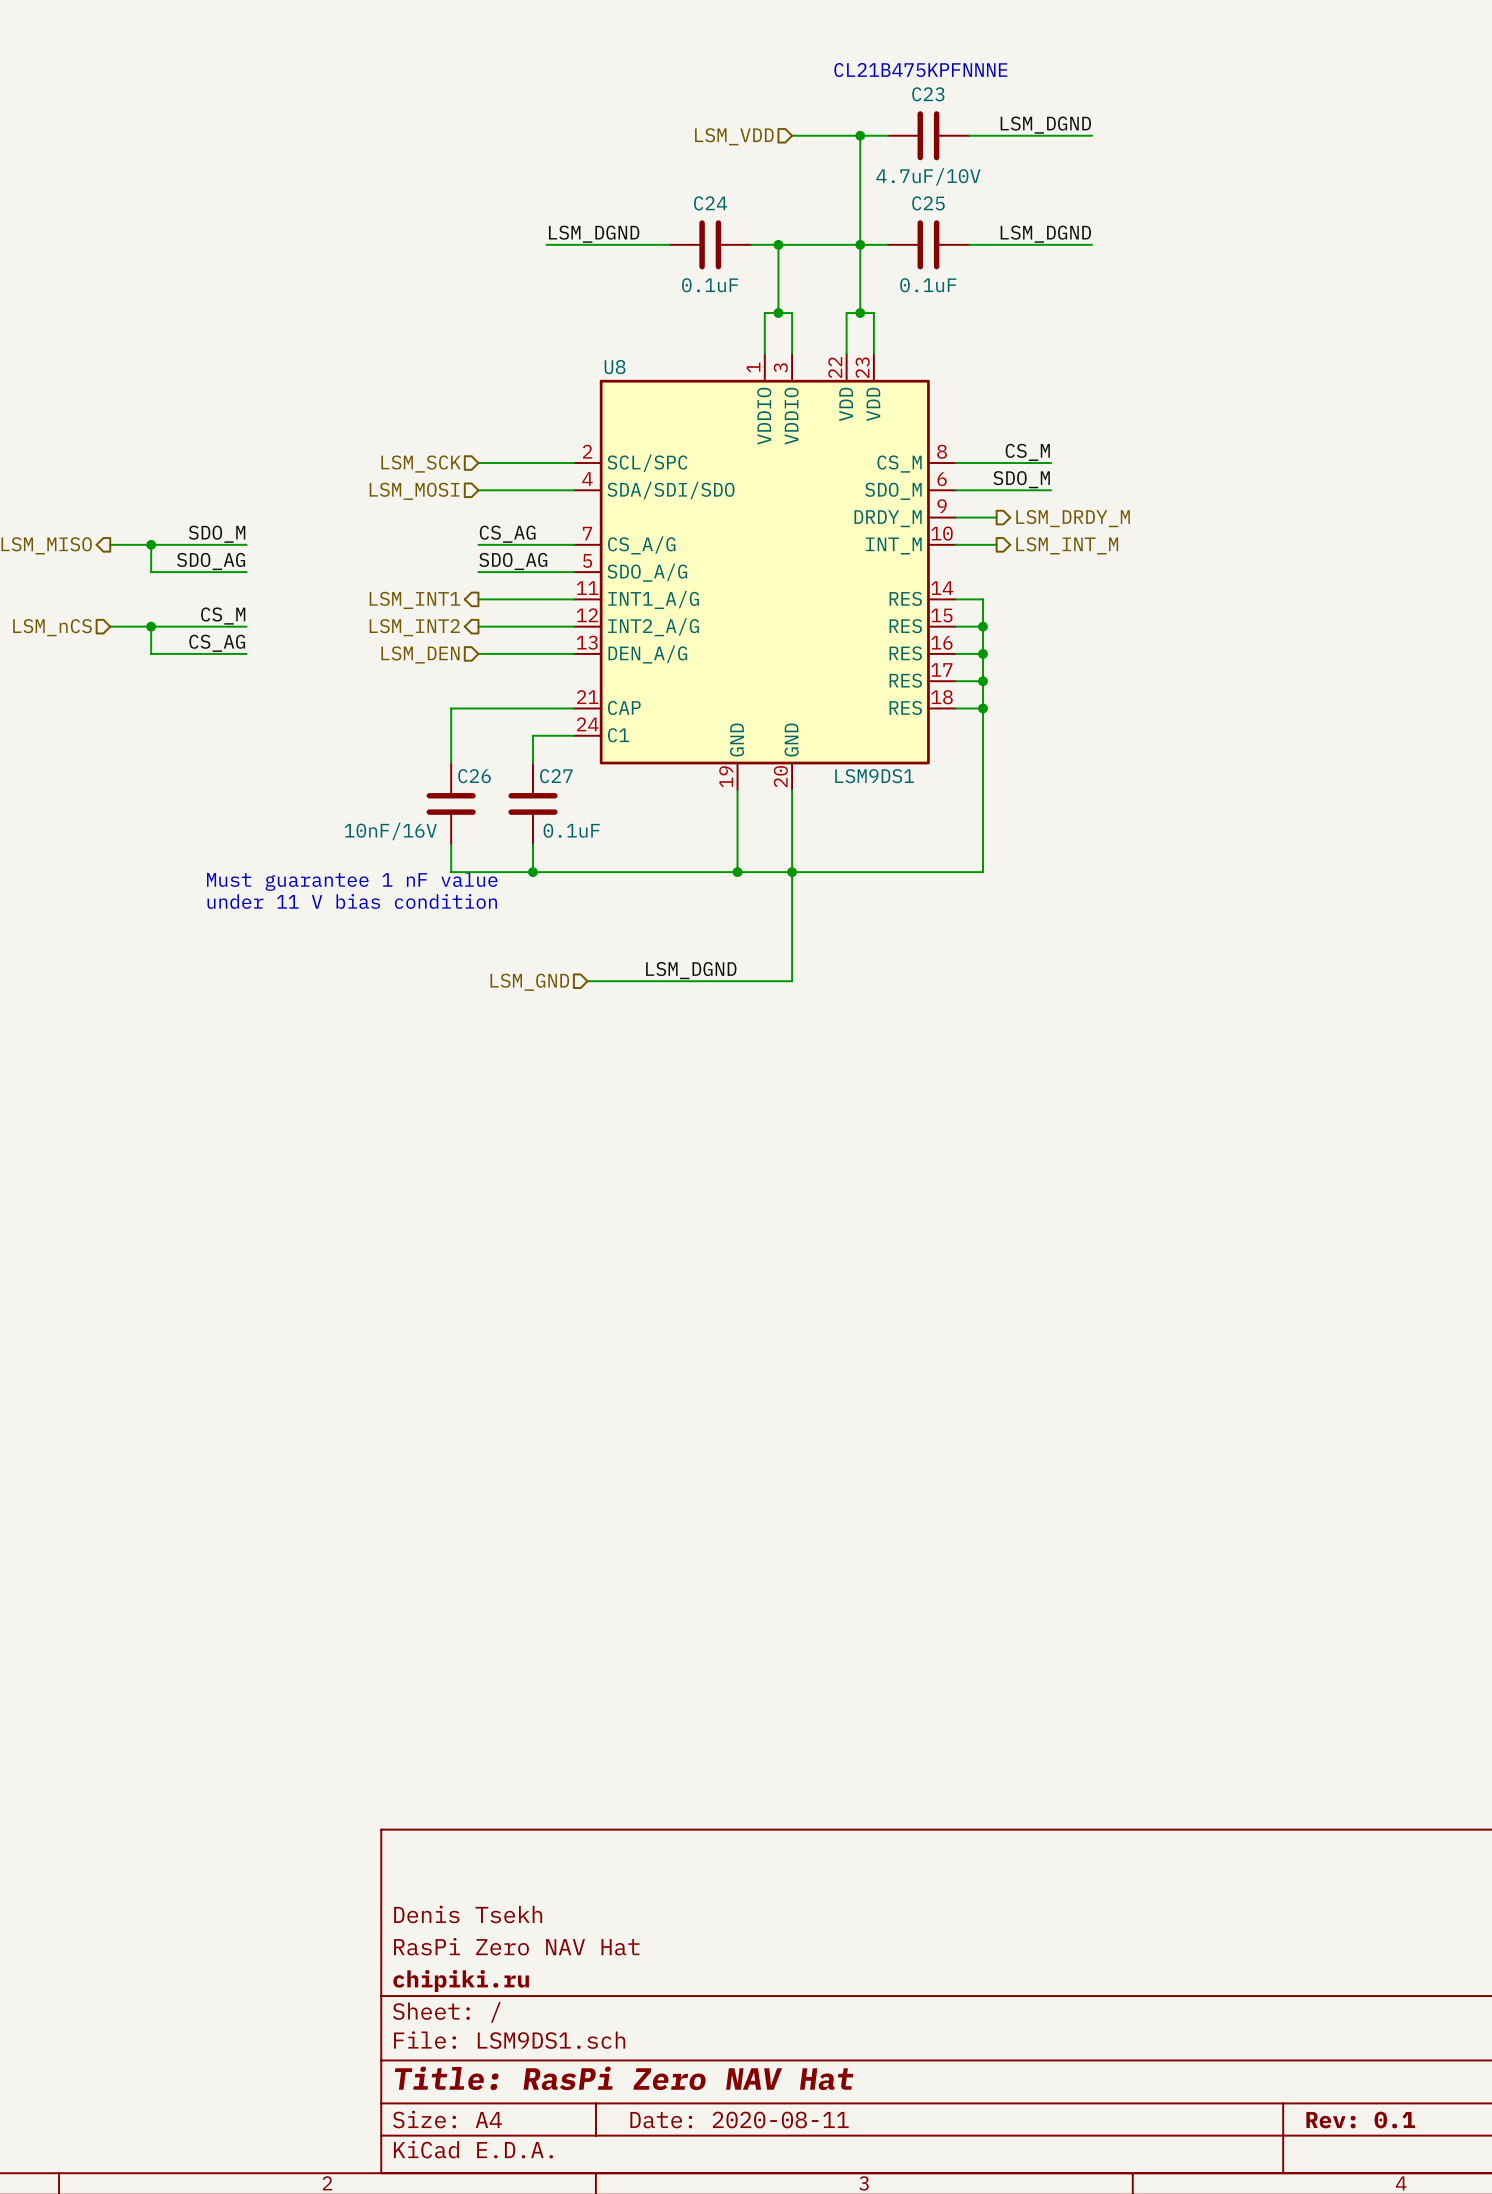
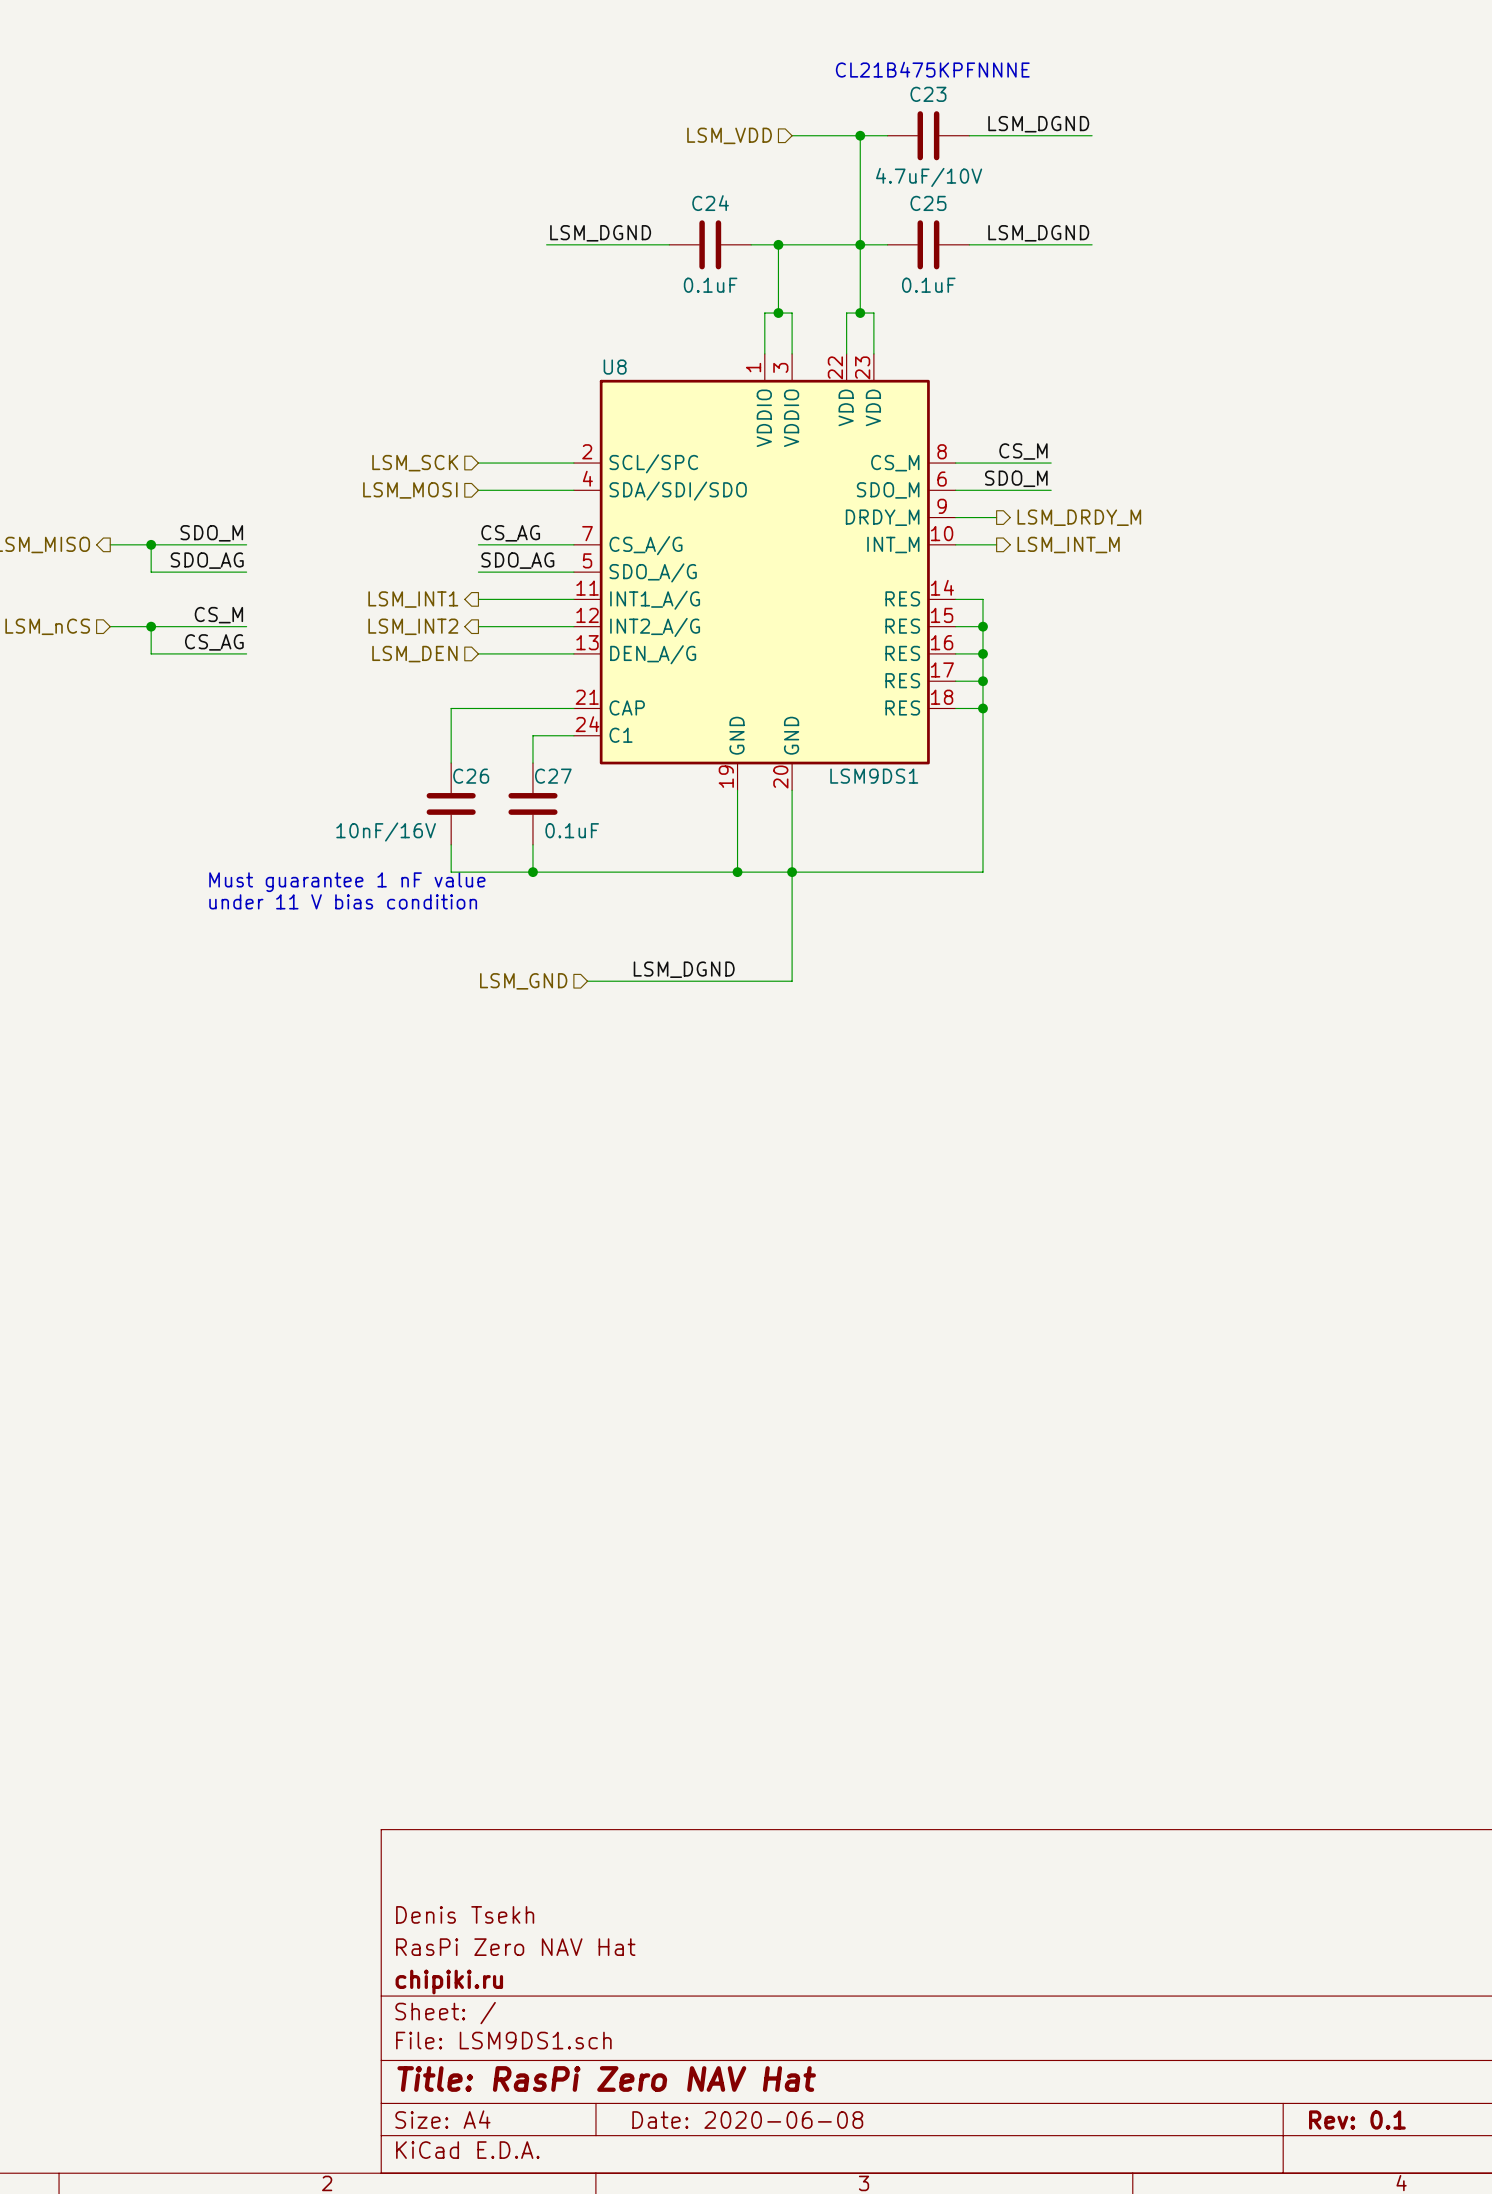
title block: Date: 2020-08-11 (739, 2120) -> Date: 2020-06-08 (747, 2120)

